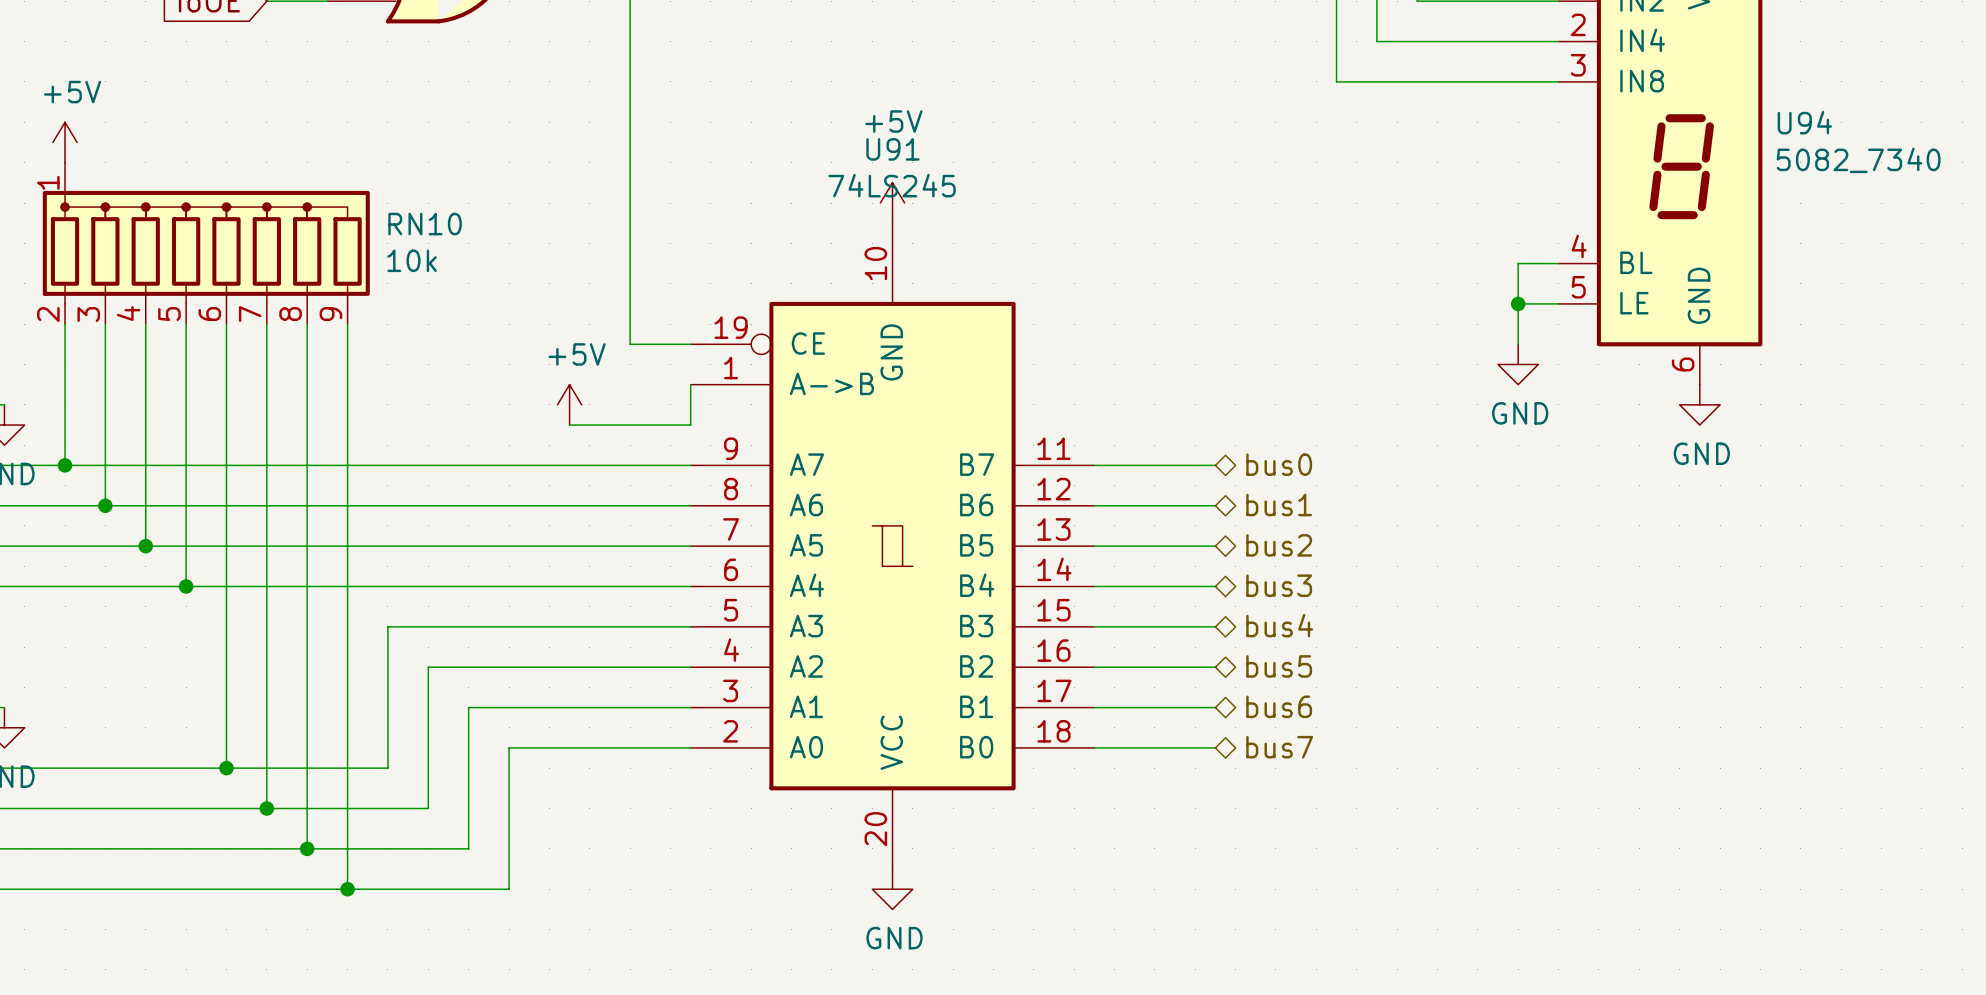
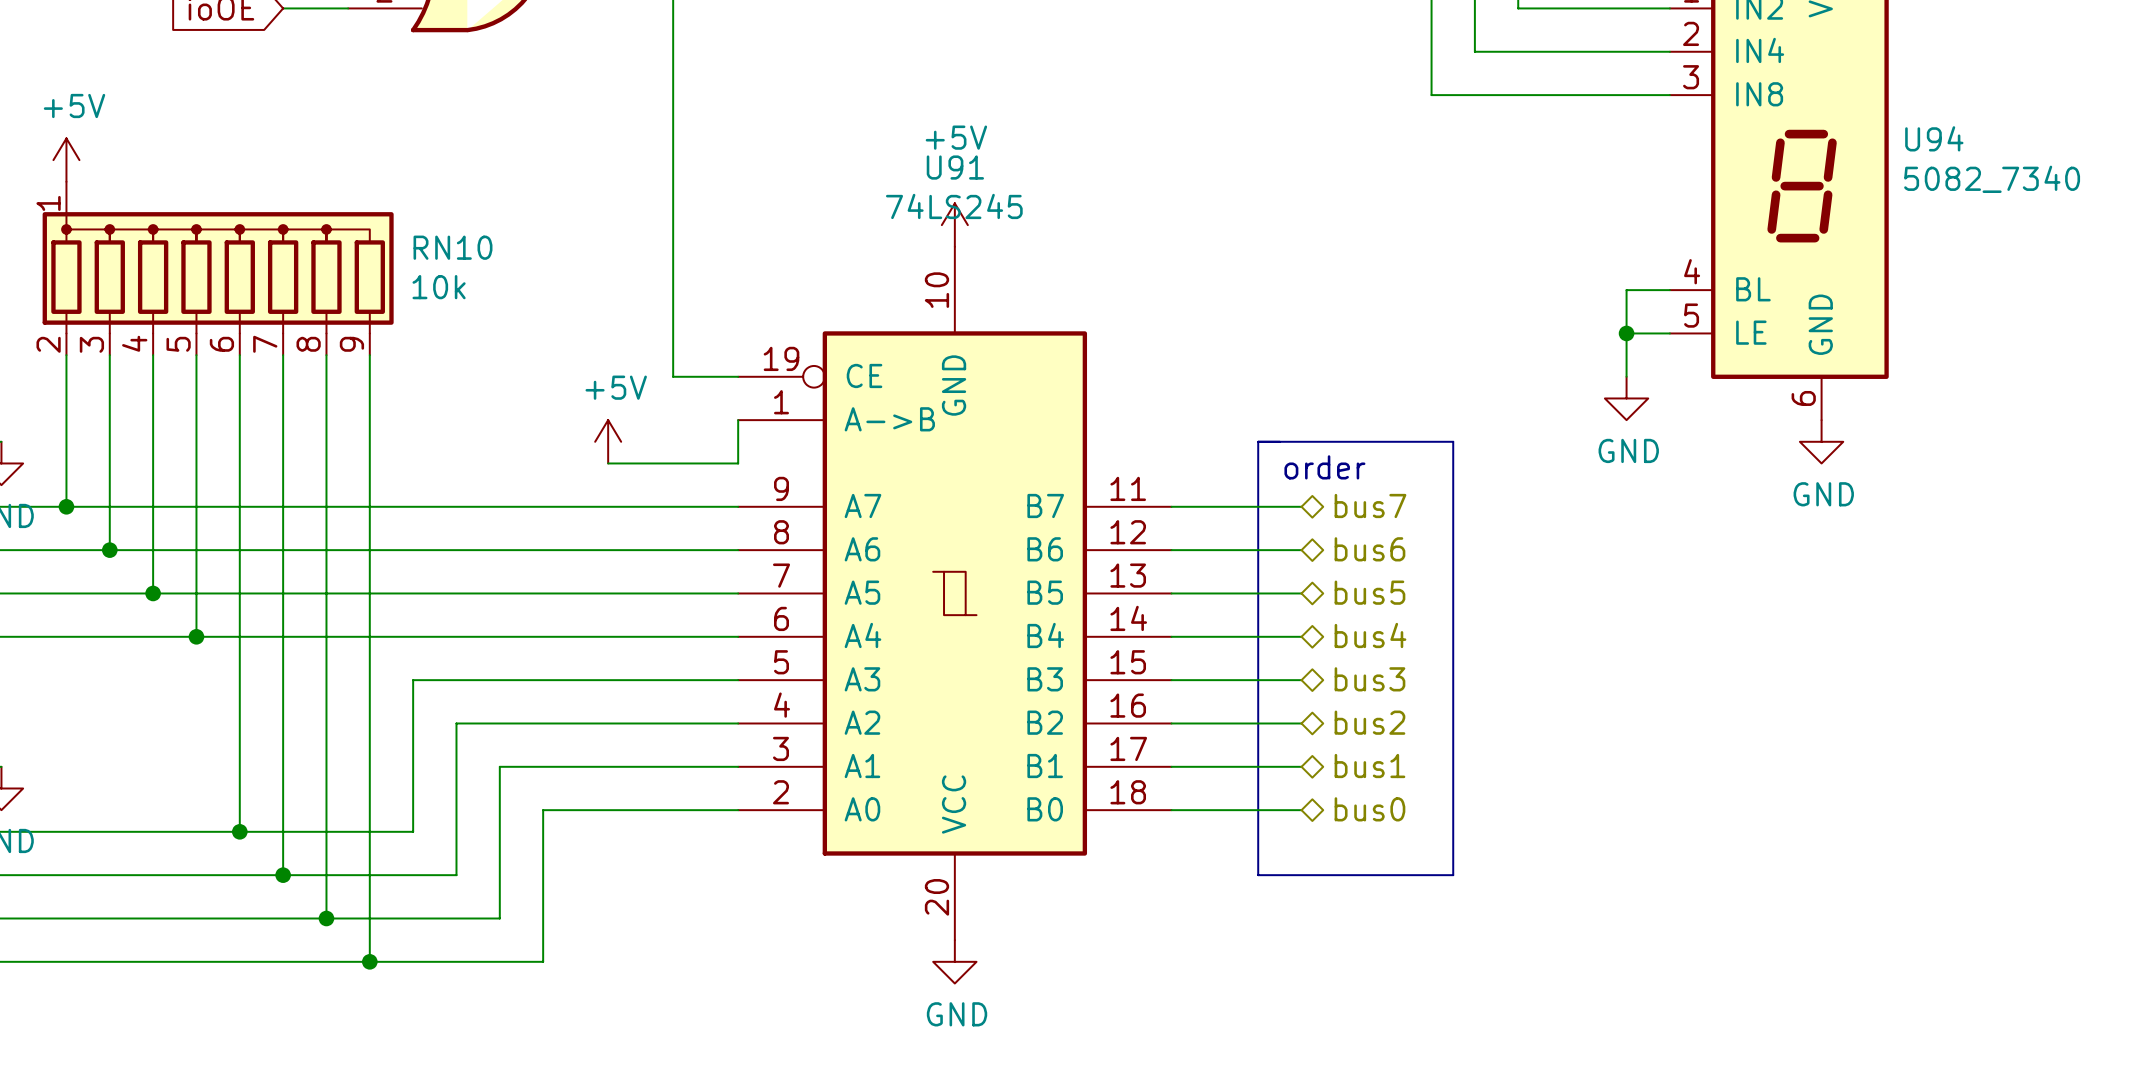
line: none -> (1258, 441) (1258, 875) (1453, 875) (1453, 441) (1258, 441)
text: none -> order (1324, 467)
hierarchical label: bus0 (1279, 464) -> bus7 (1370, 505)
hierarchical label: bus1 (1279, 505) -> bus6 (1369, 549)
hierarchical label: bus2 (1279, 545) -> bus5 (1369, 592)
hierarchical label: bus3 (1279, 585) -> bus4 (1370, 635)
hierarchical label: bus4 (1279, 625) -> bus3 (1369, 679)
hierarchical label: bus5 (1279, 666) -> bus2 (1369, 722)
hierarchical label: bus6 (1279, 706) -> bus1 (1369, 766)
hierarchical label: bus7 (1279, 747) -> bus0 (1369, 809)

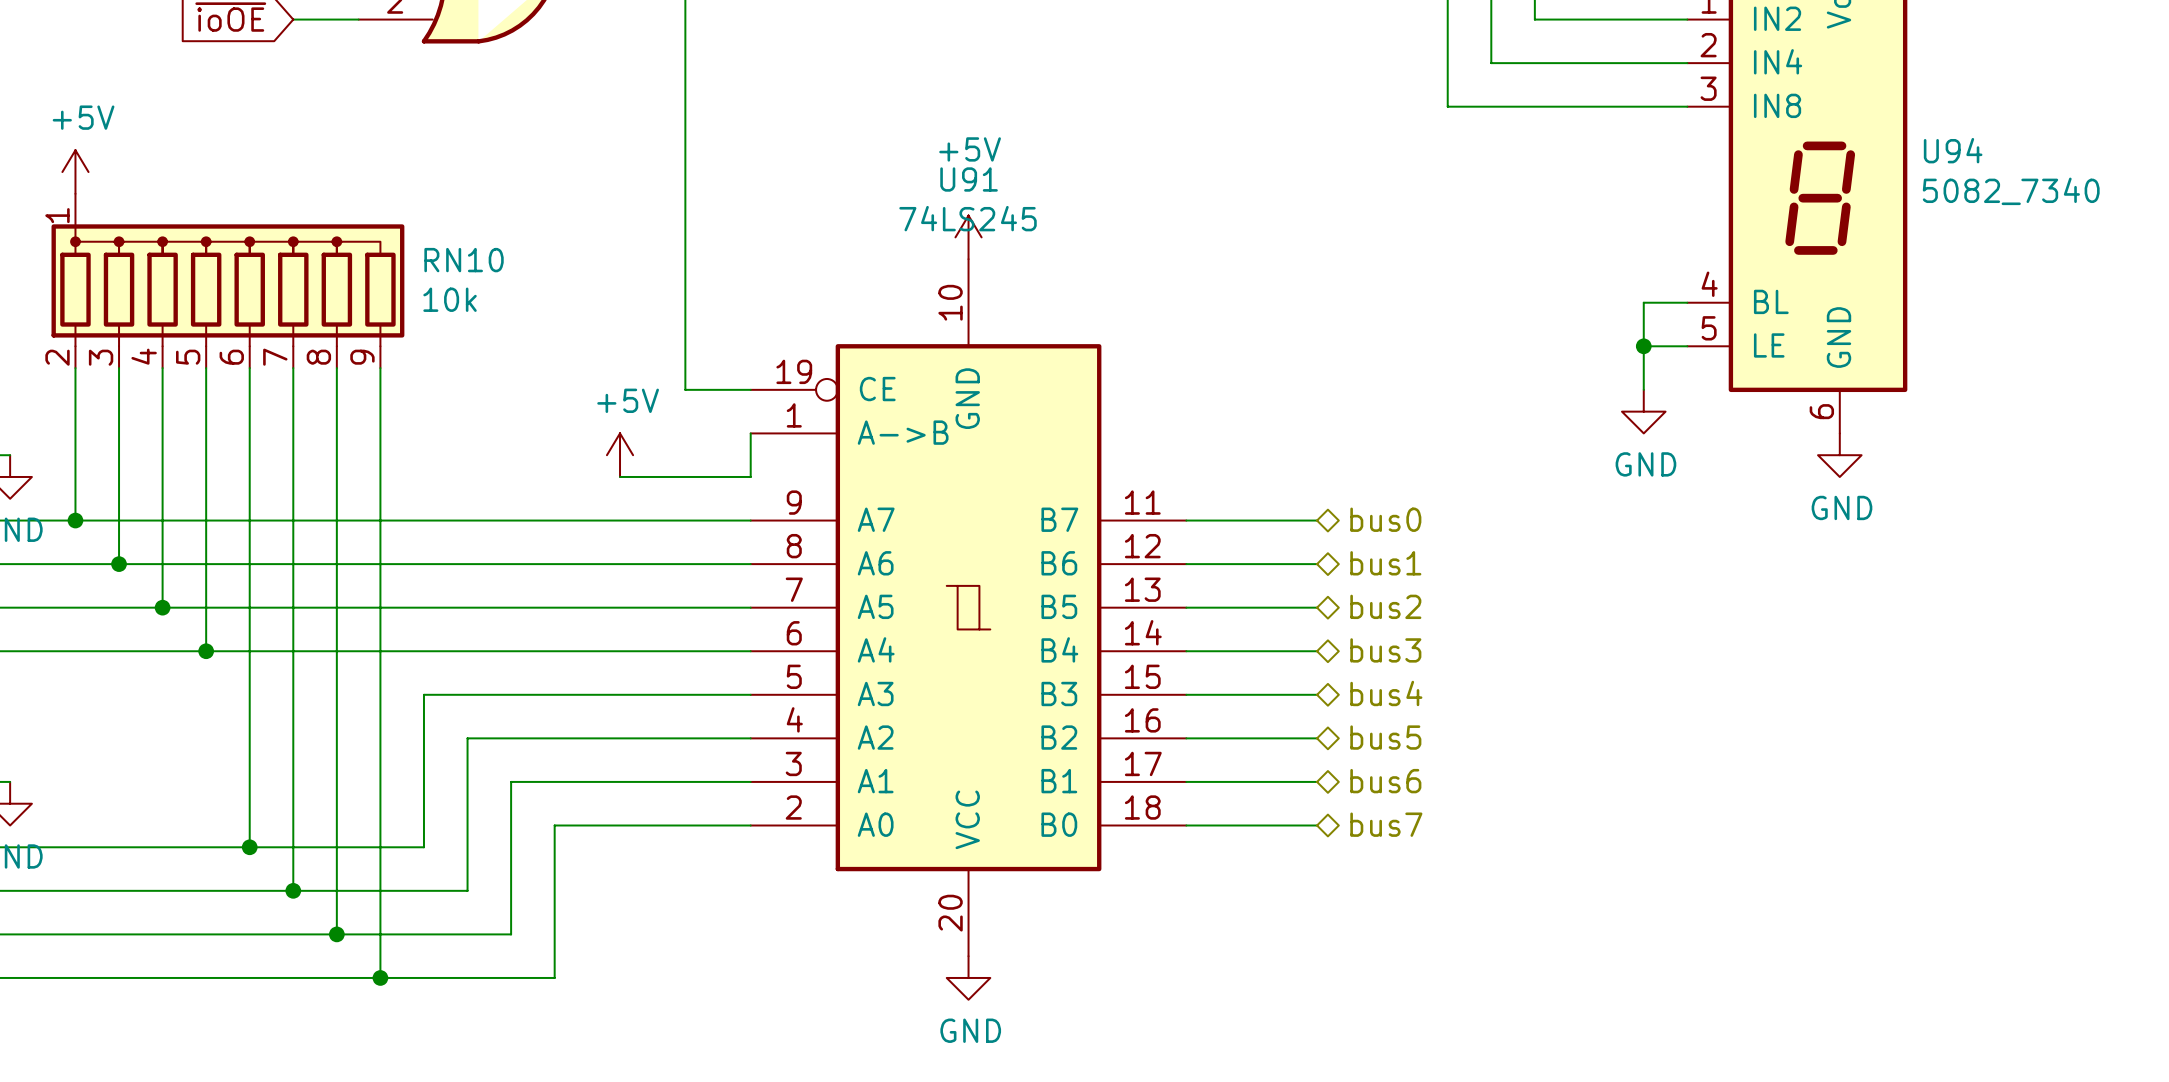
line: (1258, 441) (1258, 875) (1453, 875) (1453, 441) (1258, 441) -> none
text: order (1324, 467) -> none
hierarchical label: bus7 (1370, 505) -> bus0 (1385, 519)
hierarchical label: bus6 (1369, 549) -> bus1 (1385, 563)
hierarchical label: bus5 (1369, 592) -> bus2 (1385, 606)
hierarchical label: bus4 (1370, 635) -> bus3 (1385, 650)
hierarchical label: bus3 (1369, 679) -> bus4 (1386, 693)
hierarchical label: bus2 (1369, 722) -> bus5 (1385, 737)
hierarchical label: bus1 (1369, 766) -> bus6 (1385, 781)
hierarchical label: bus0 (1369, 809) -> bus7 (1386, 824)

